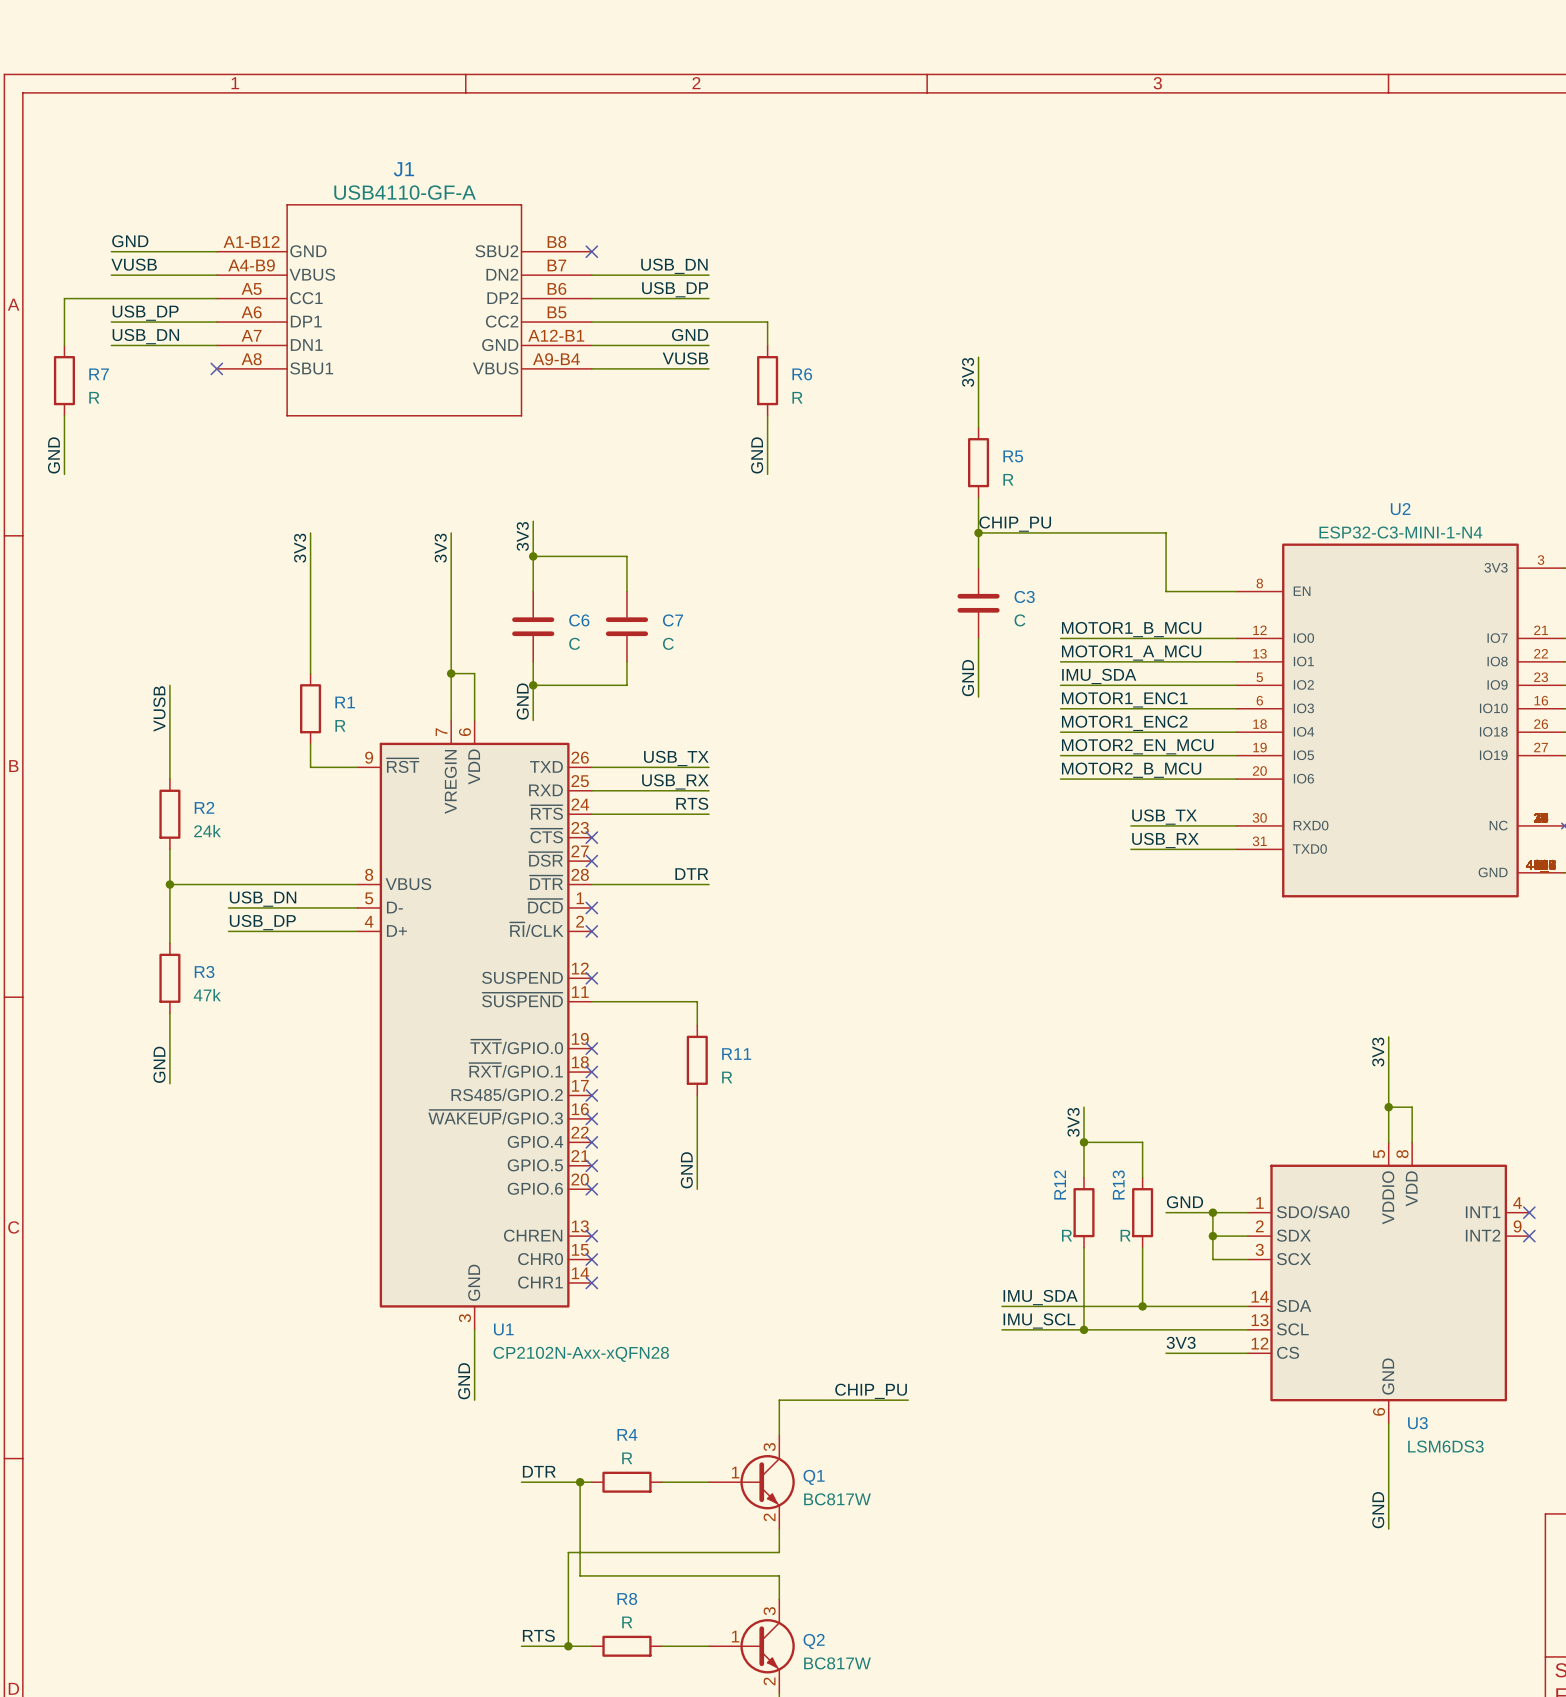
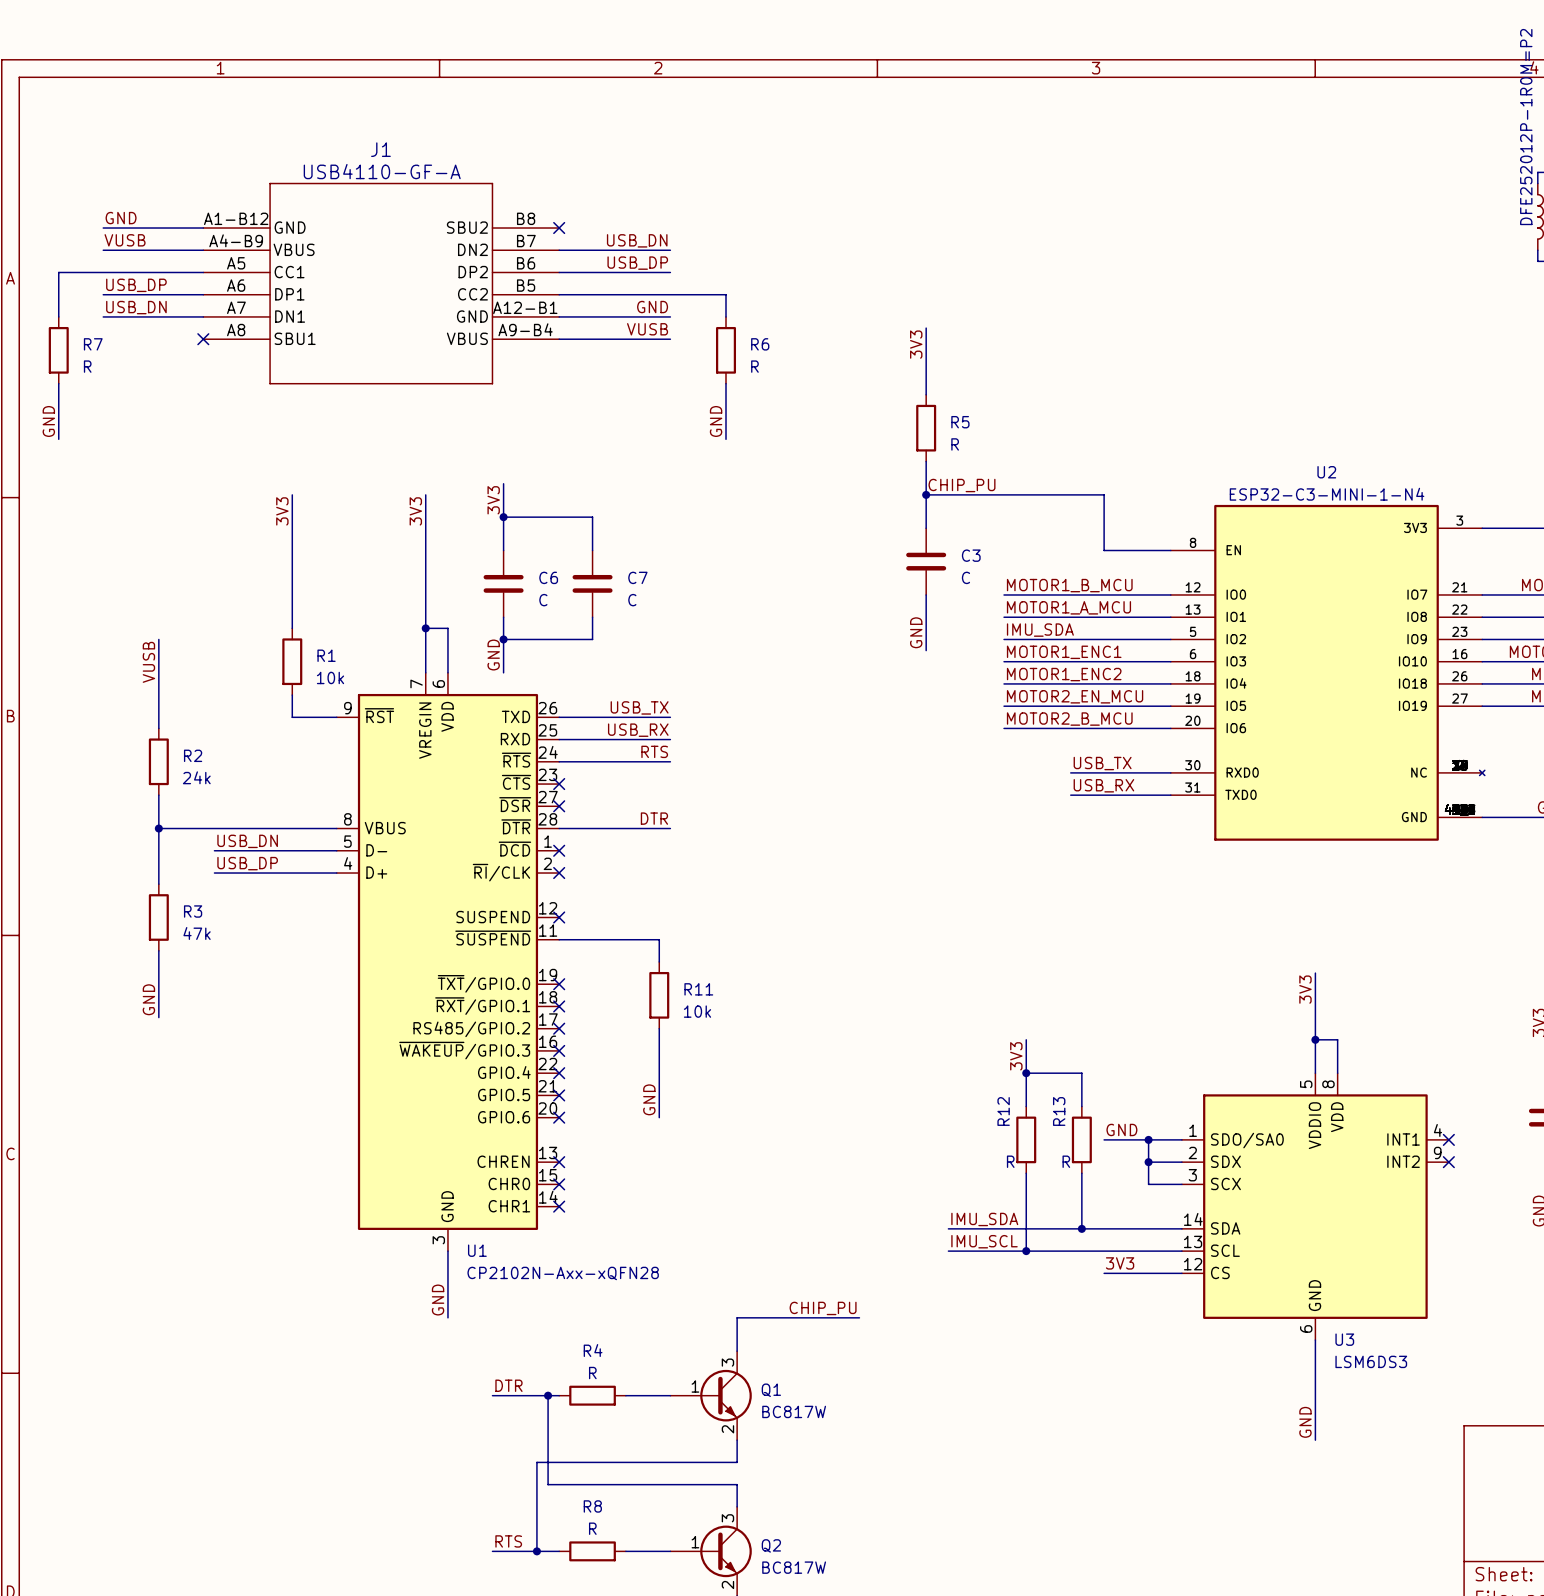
R1 value: R (340, 725) -> 10k (330, 677)
R11 value: R (727, 1077) -> 10k (697, 1011)

